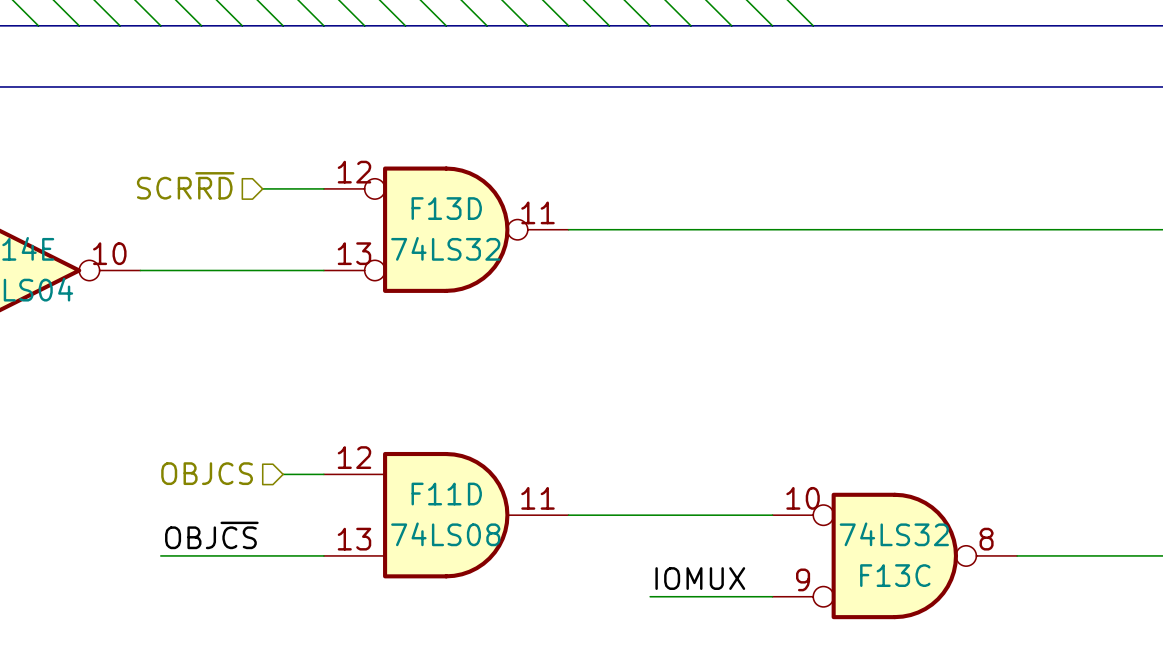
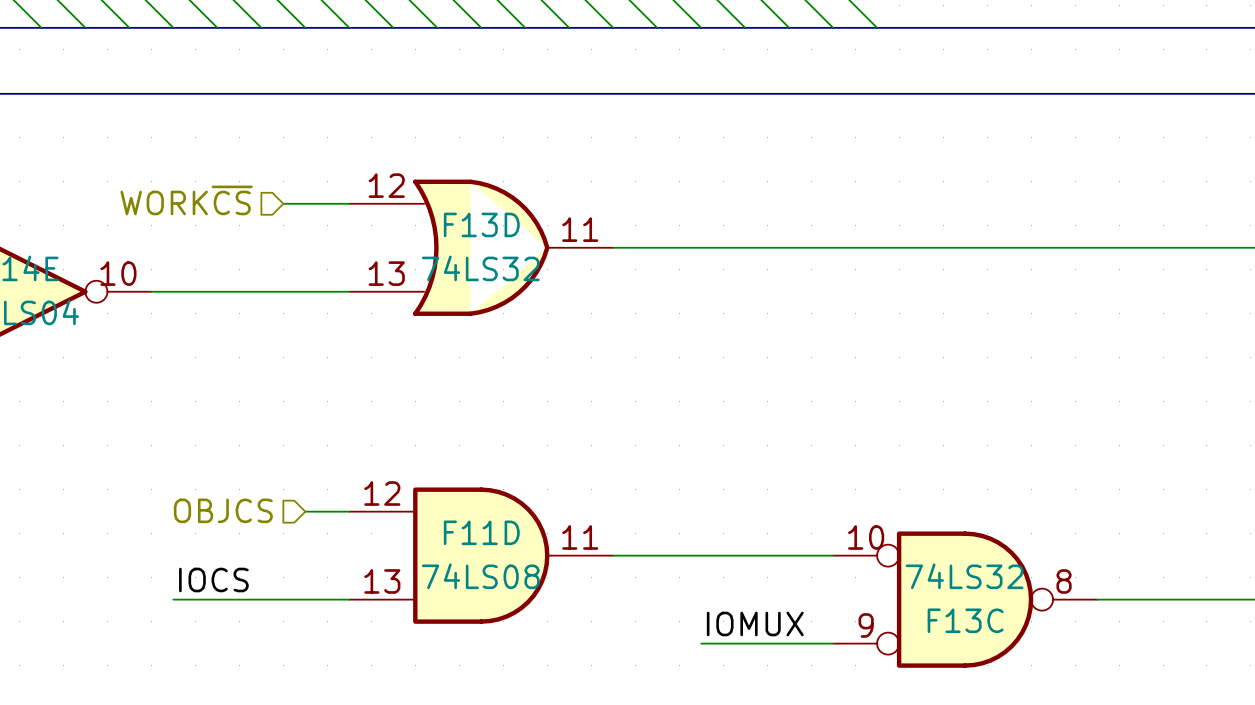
F13D symbol: [323, 166, 569, 293] -> [349, 179, 614, 316]
hierarchical label: SCR~{RD} (185, 185) -> WORK~{CS} (186, 200)
label: OBJ~{CS} (211, 535) -> IOCS (213, 580)

